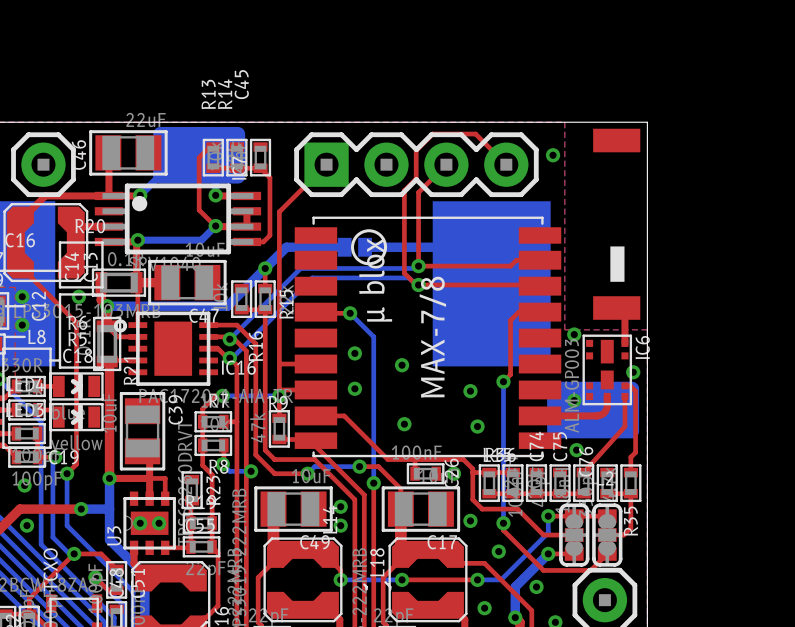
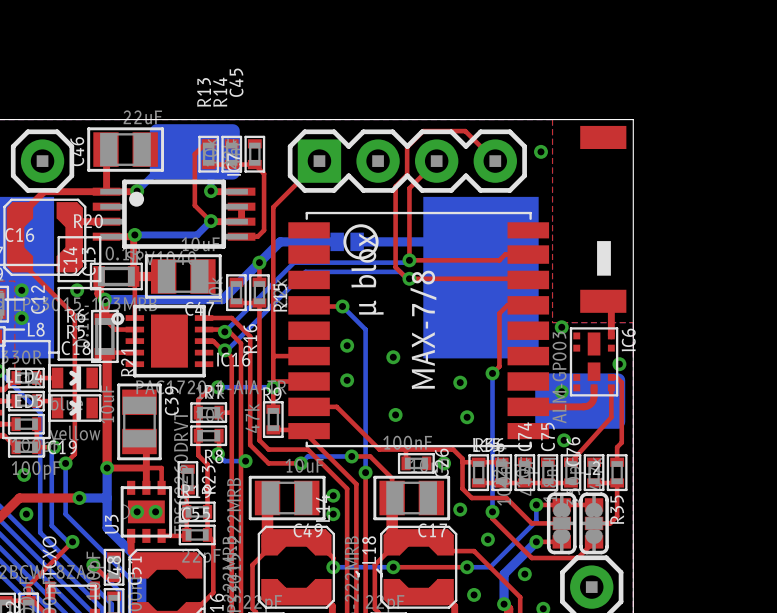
top track: (74, 553) (101, 553) (116, 569) -> none

